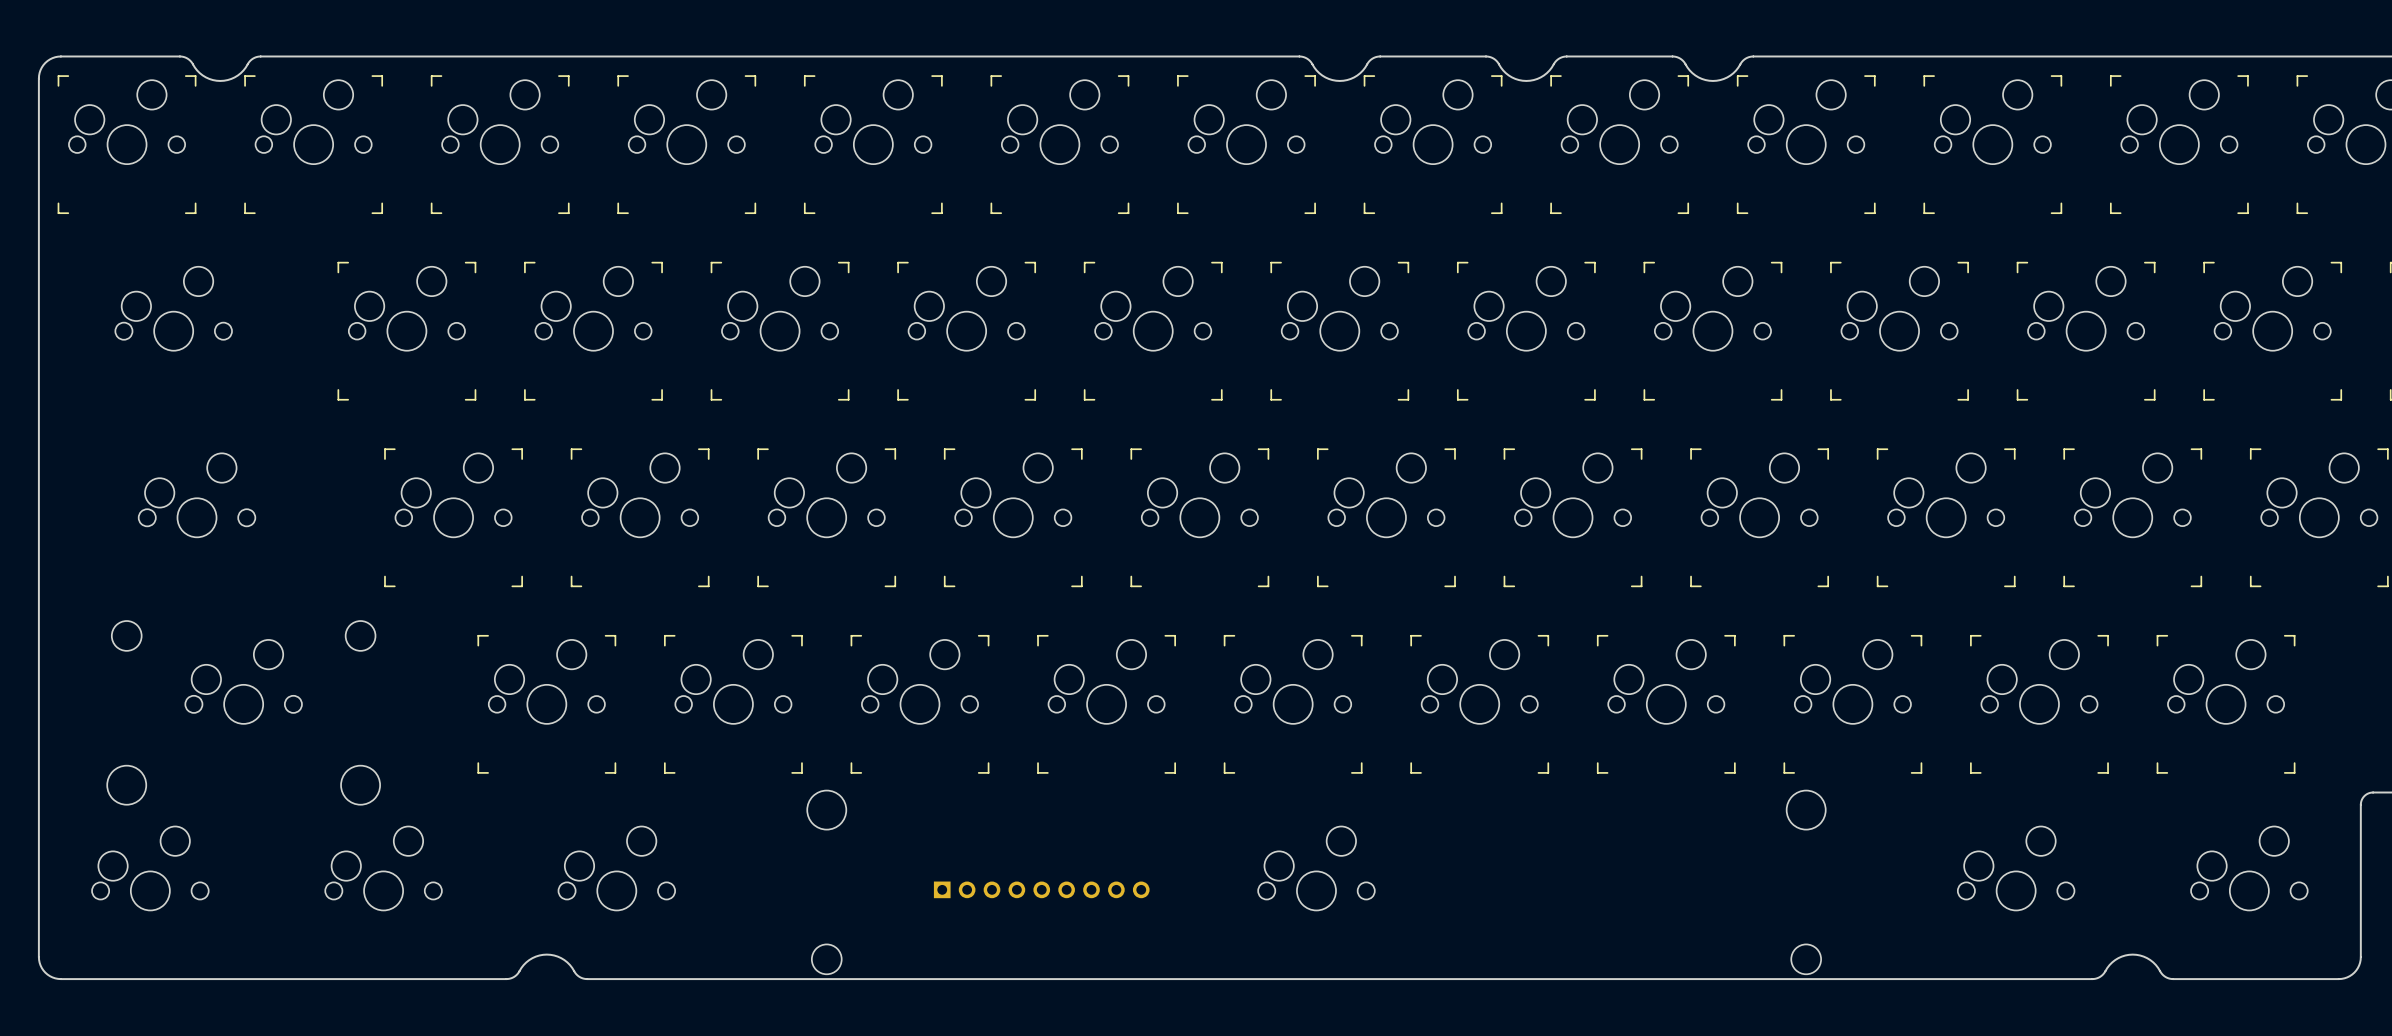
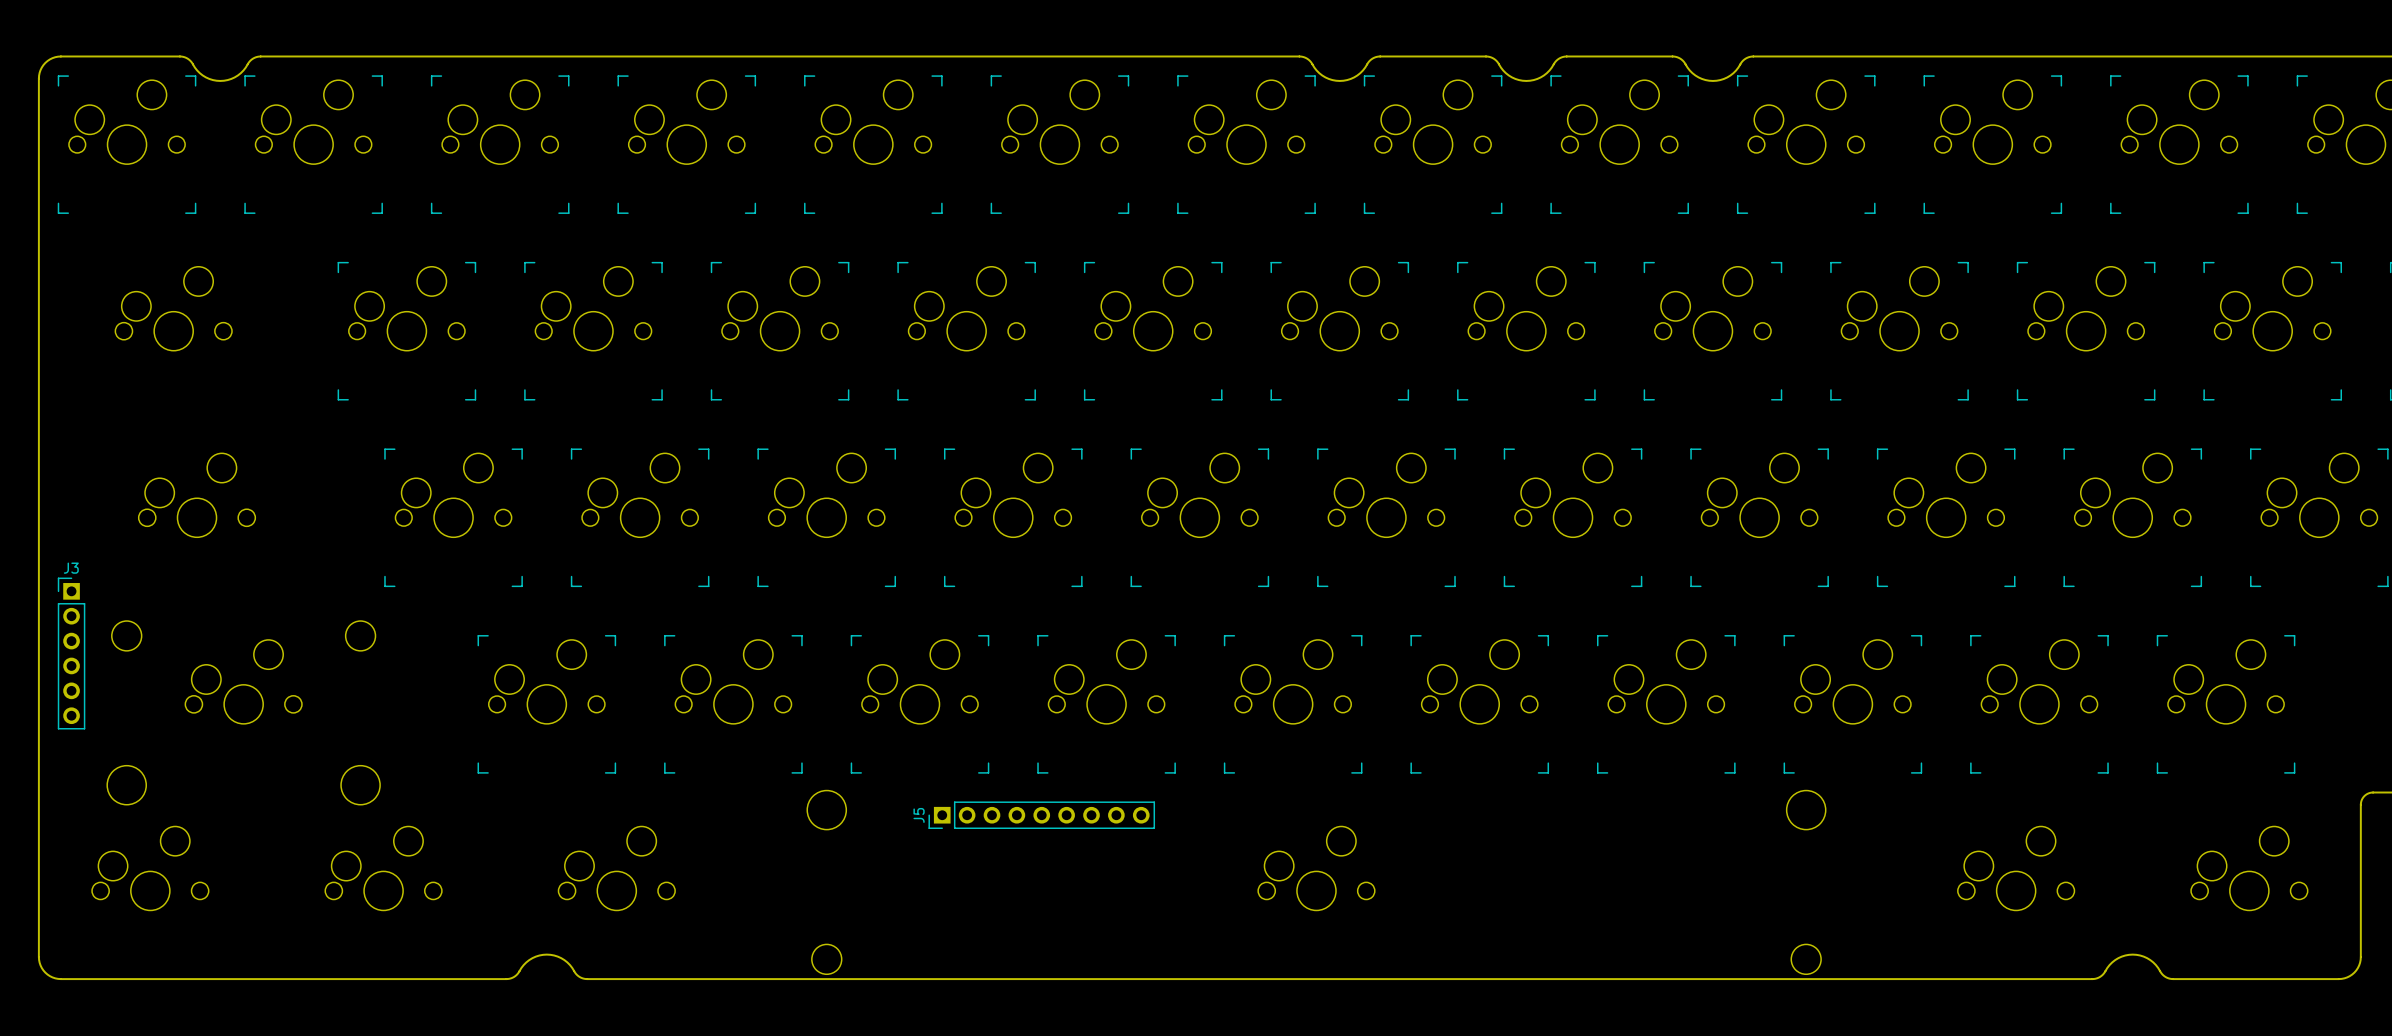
J3: none -> (71, 653)
J5: none -> (1041, 815)
part: (1041, 889) -> none

